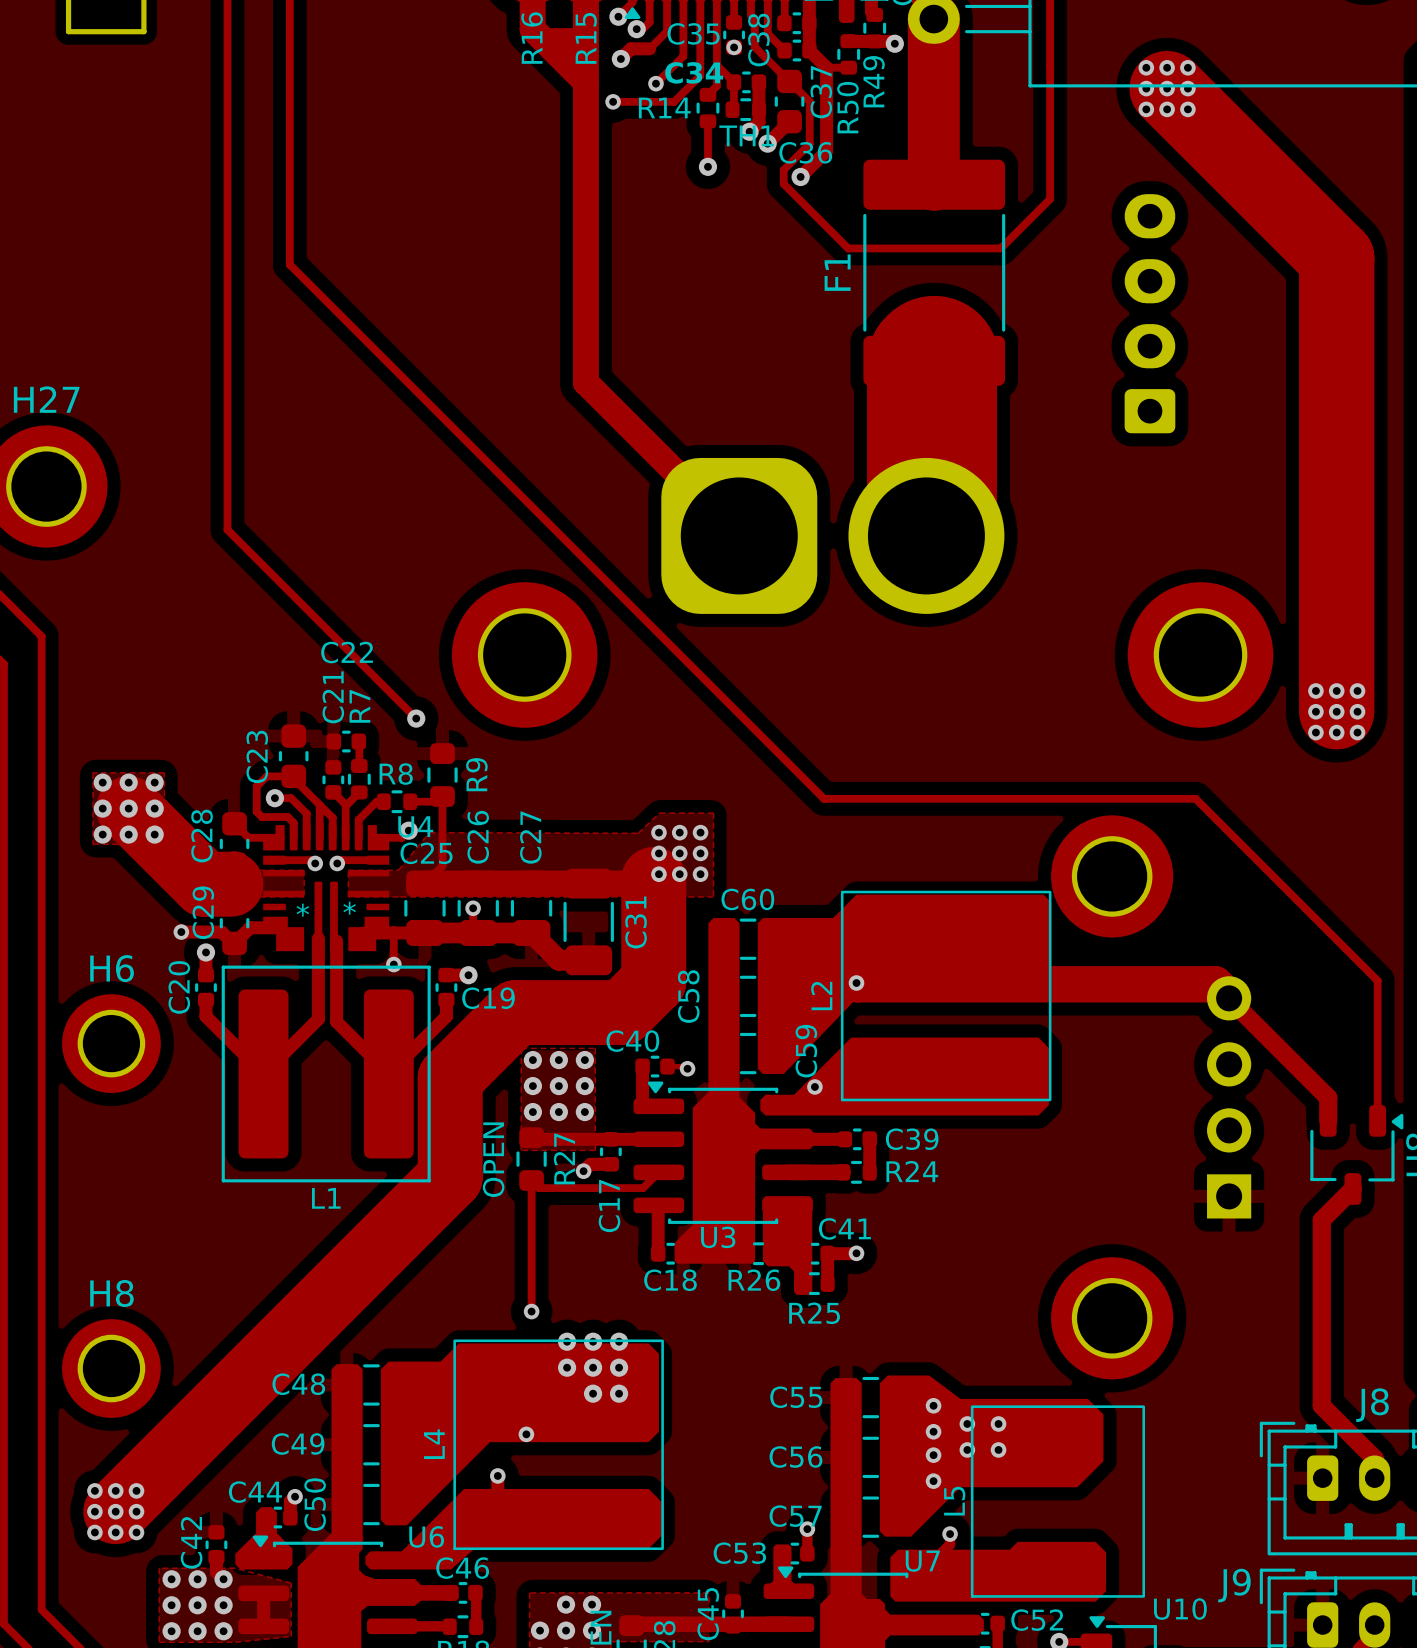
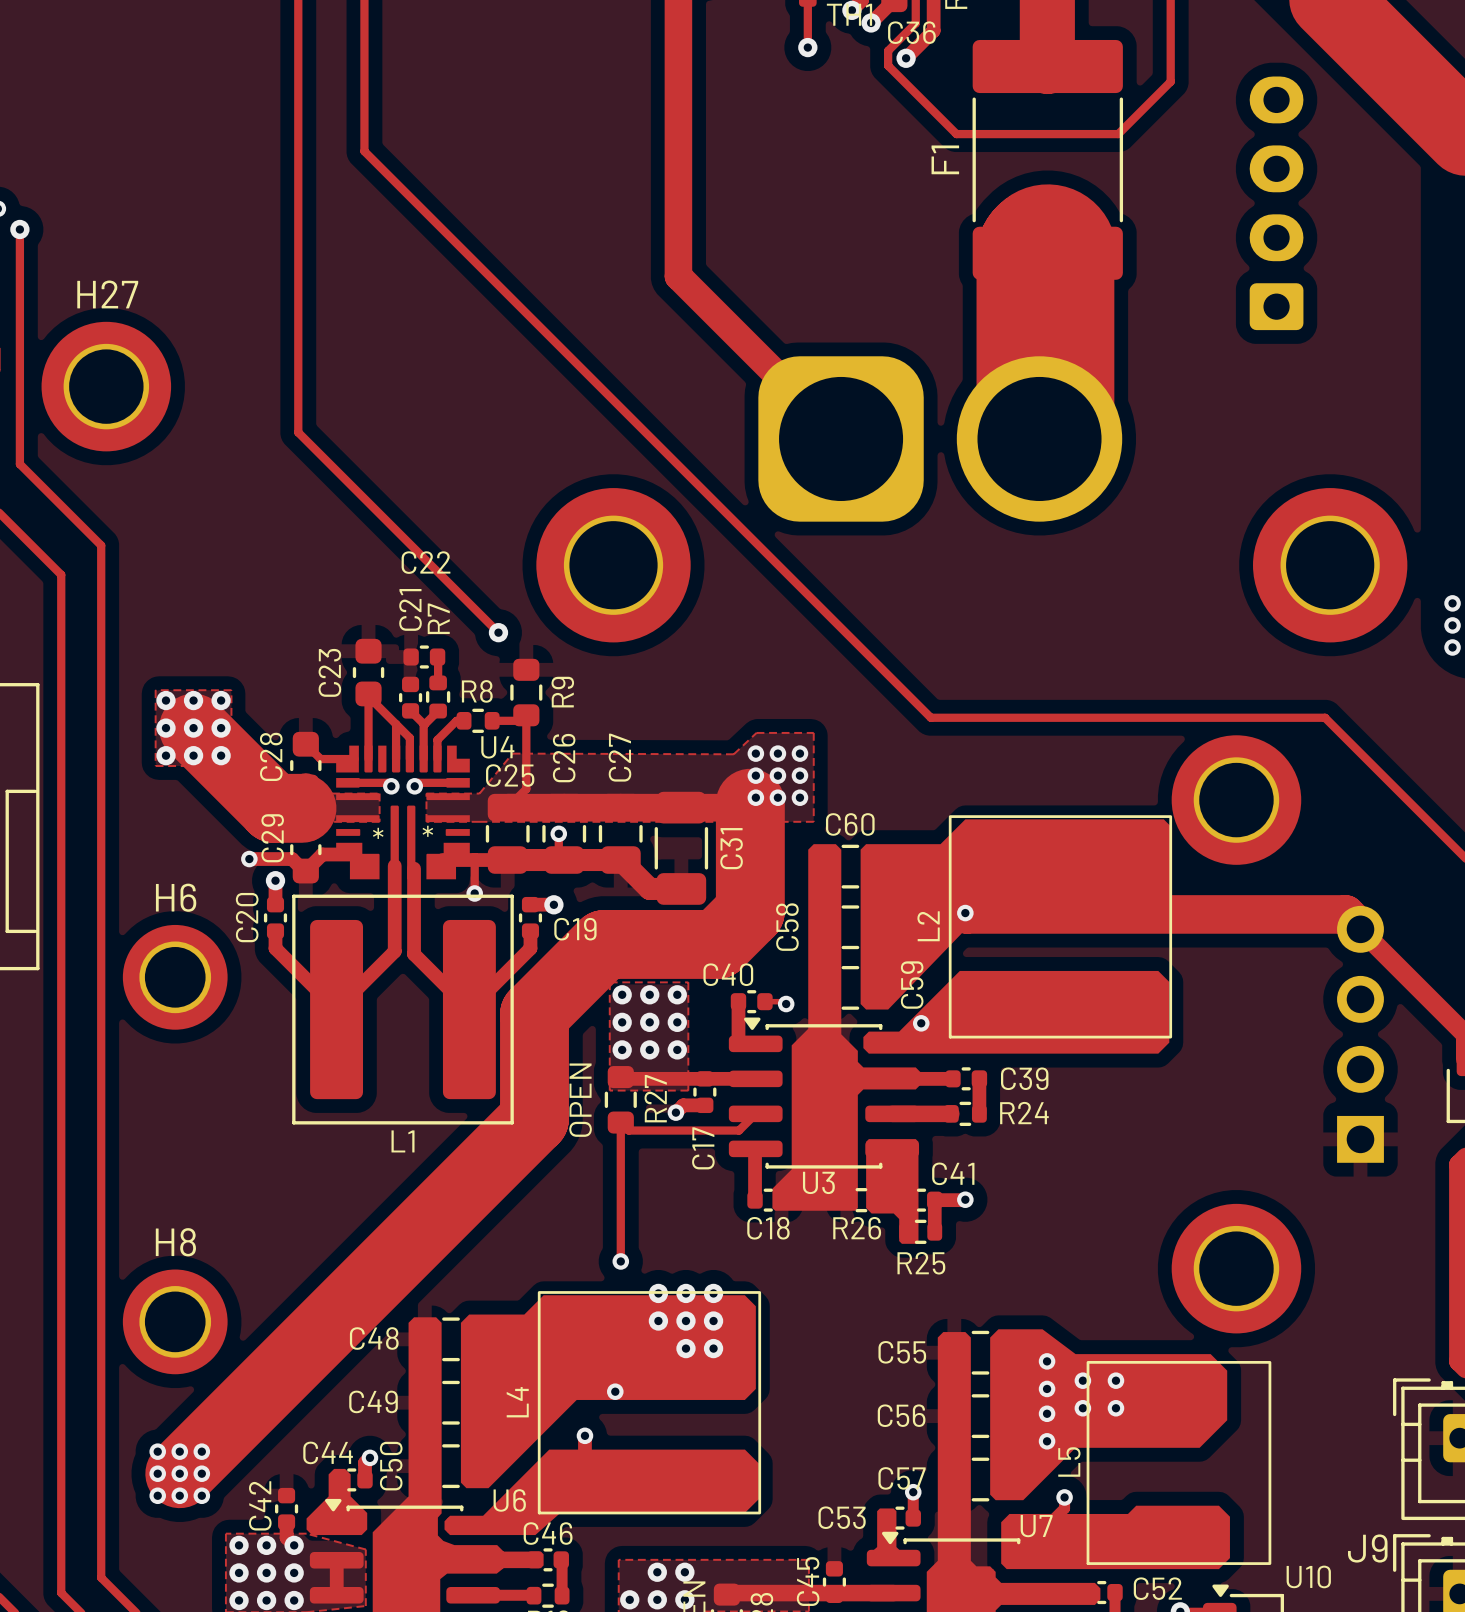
track: (293, 776) (266, 776) (256, 786) (256, 811) (261, 817) (287, 817) (293, 822) -> (368, 696) (368, 743)
track: (274, 798) (291, 798) (306, 813) (306, 837) -> none
via: (274, 798) -> none
track: (408, 830) (401, 837) (371, 837) -> none
via: (408, 830) -> none

